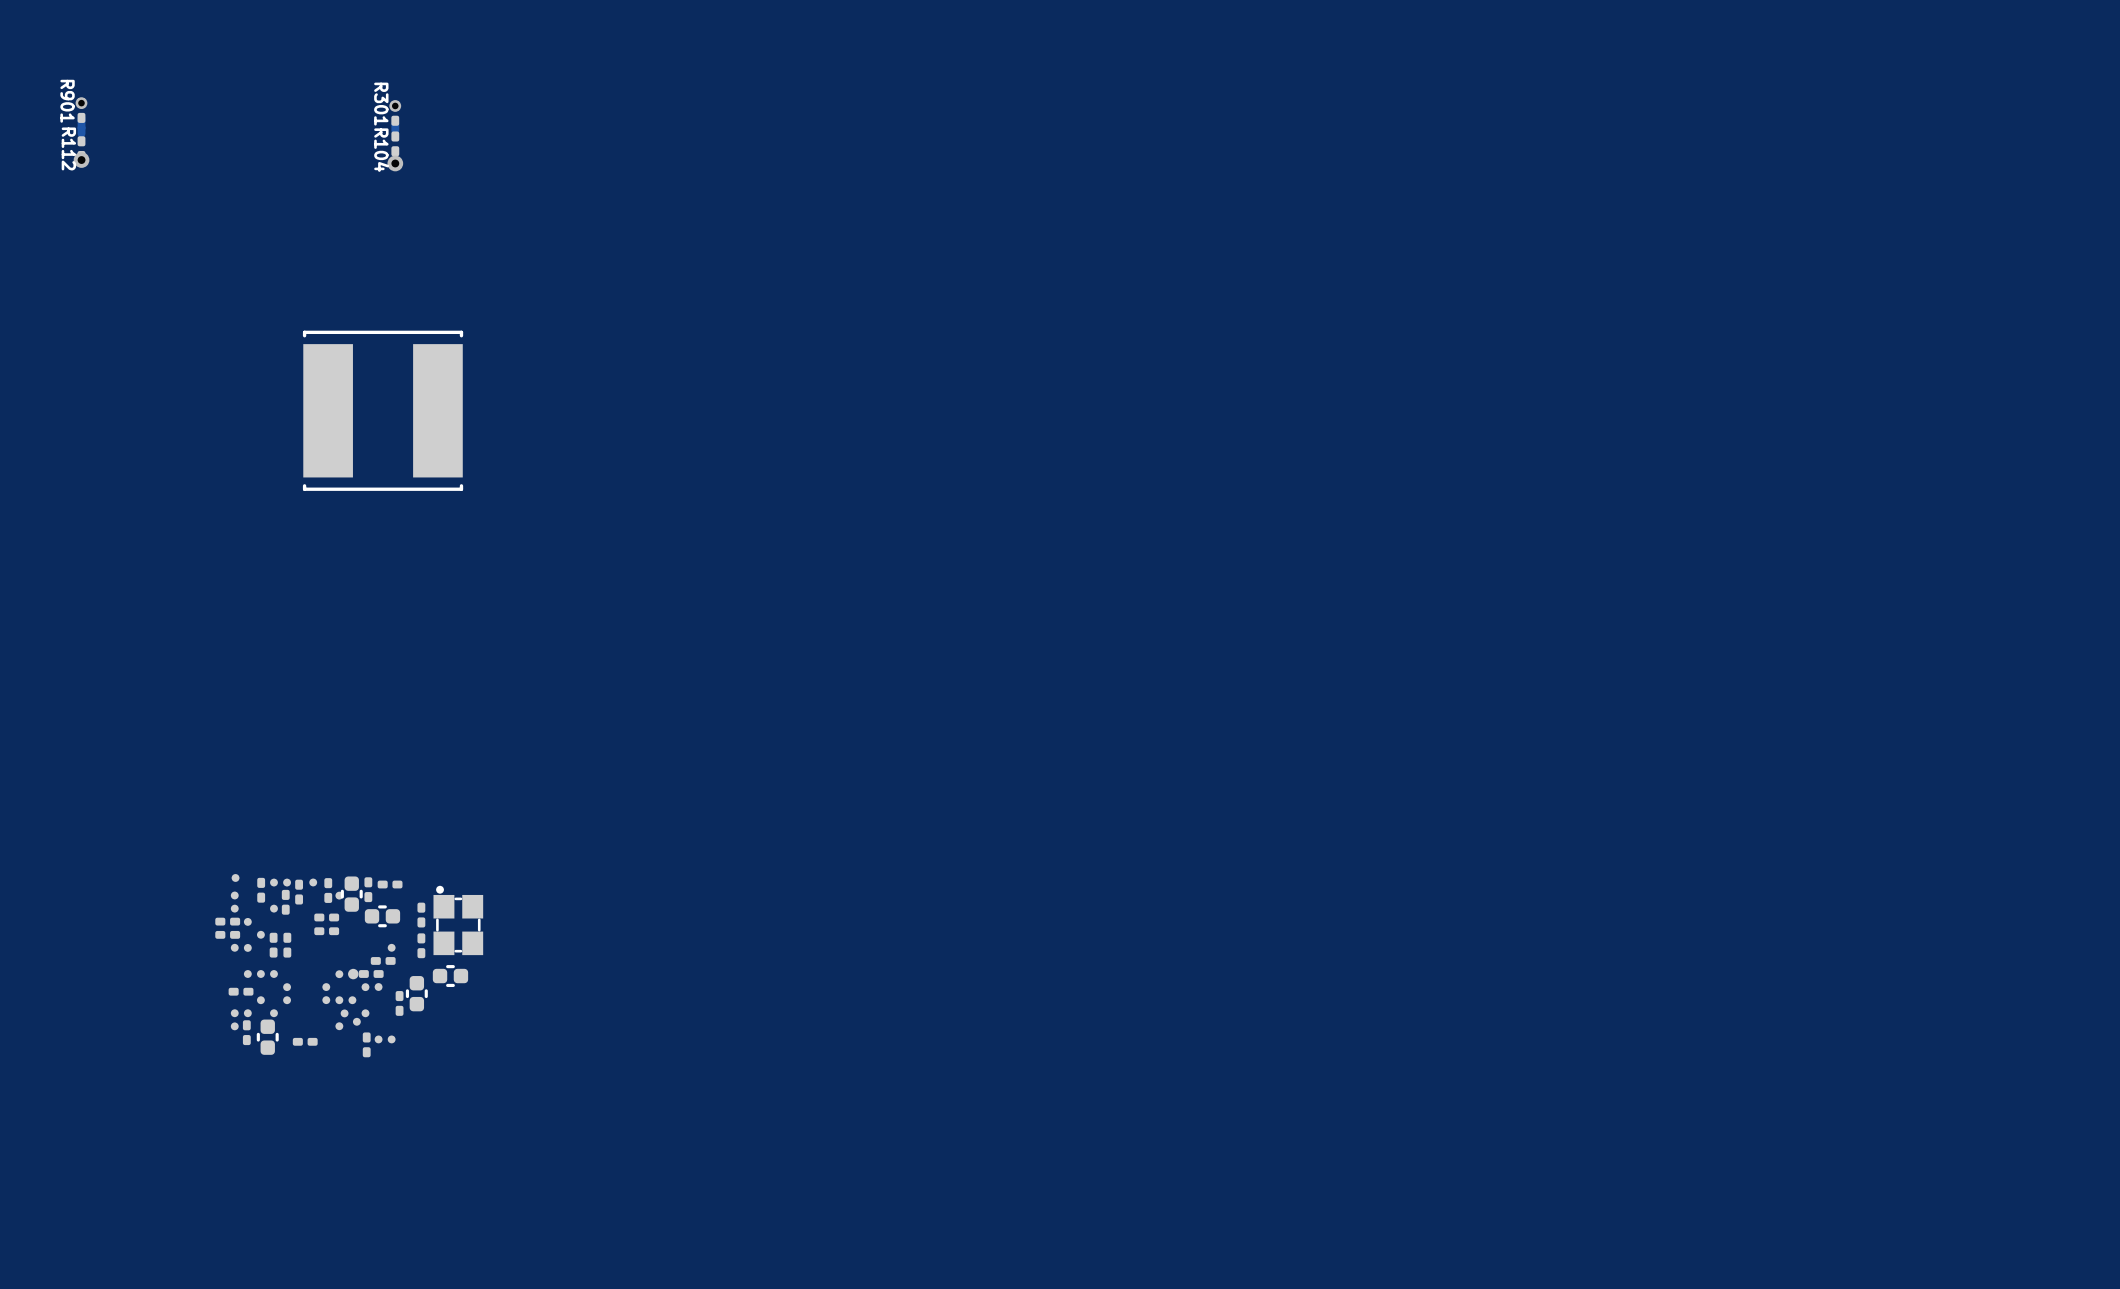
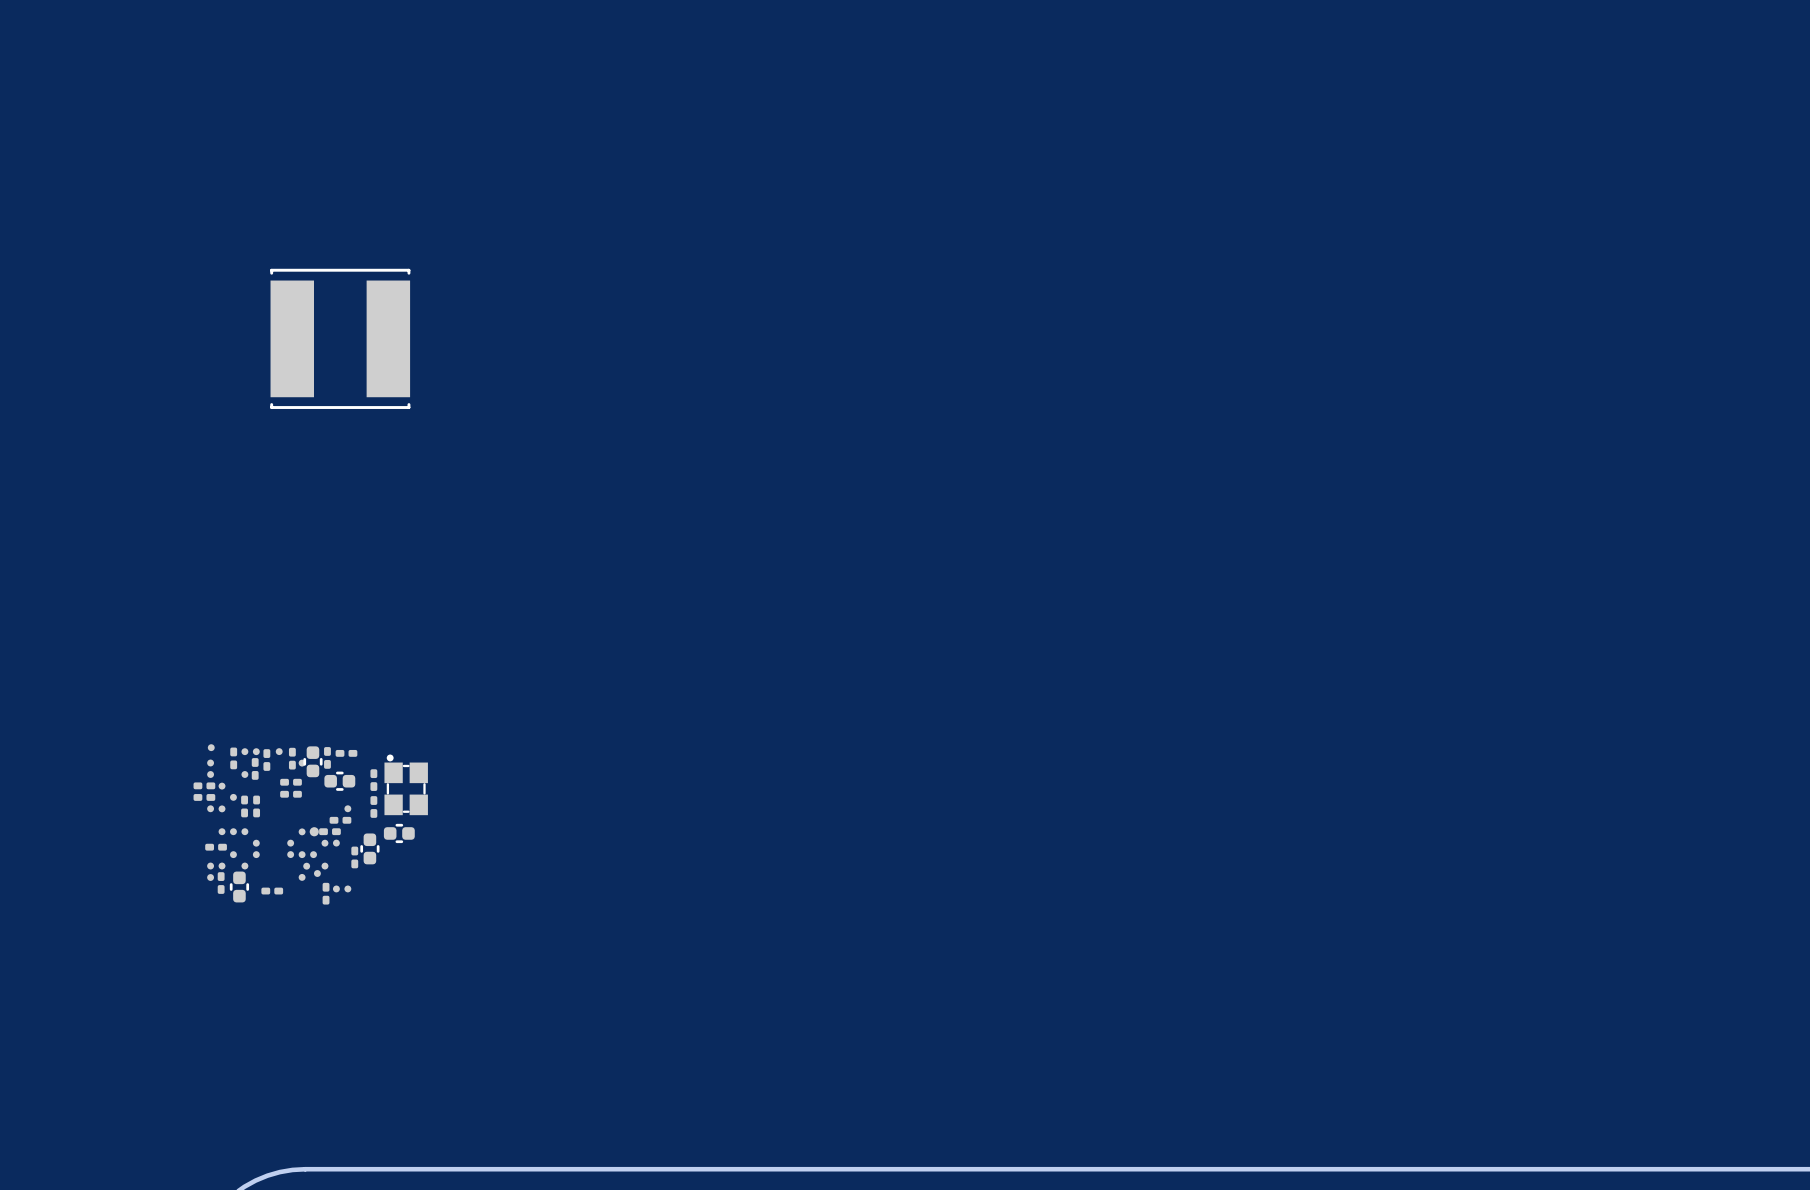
via: (81, 103) -> none
via: (395, 105) -> none
R901: (81, 110) -> none
R301: (395, 113) -> none
track: (81, 117) (81, 133) -> none
track: (395, 124) (395, 130) -> none
R104: (395, 143) -> none
R112: (81, 148) -> none
via: (81, 160) -> none
via: (395, 163) -> none

